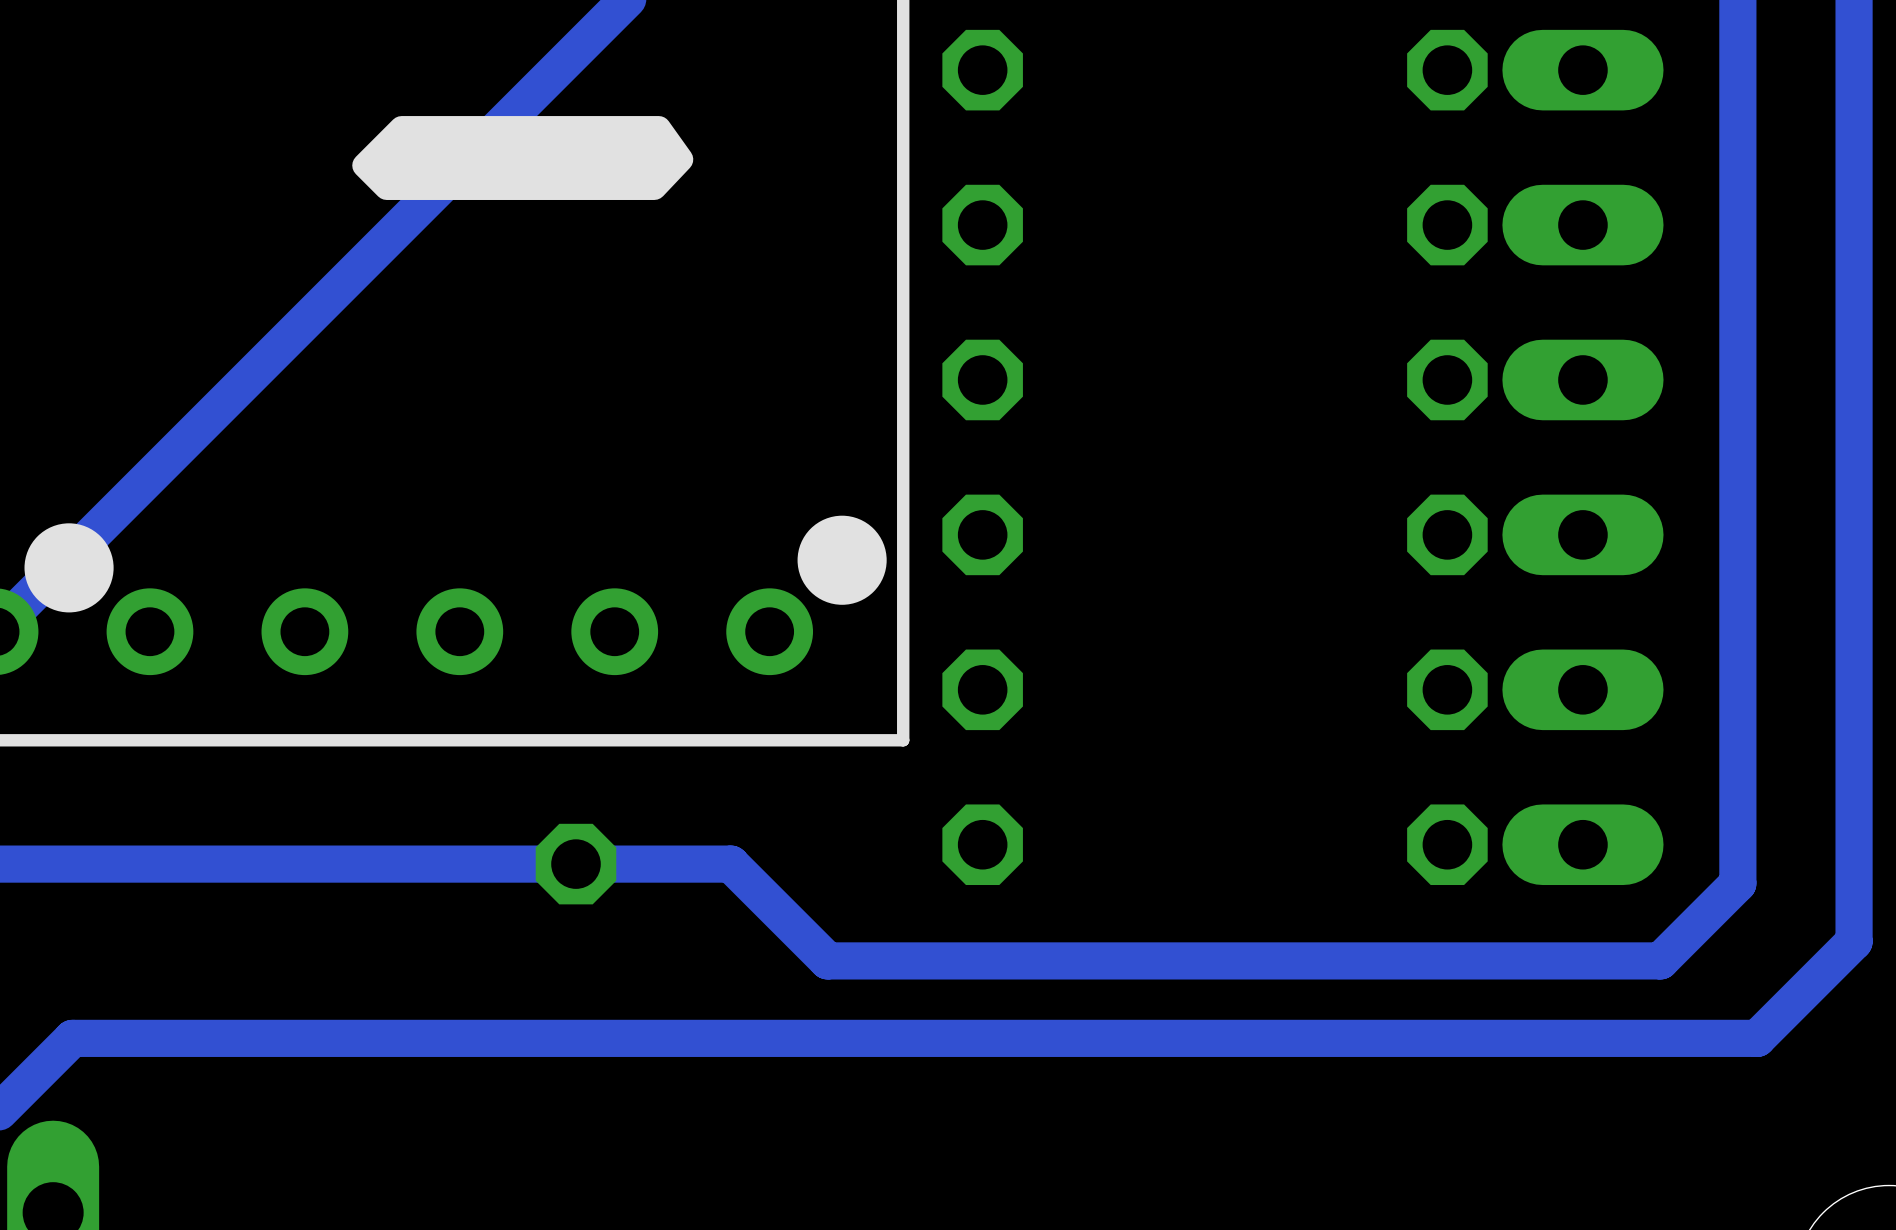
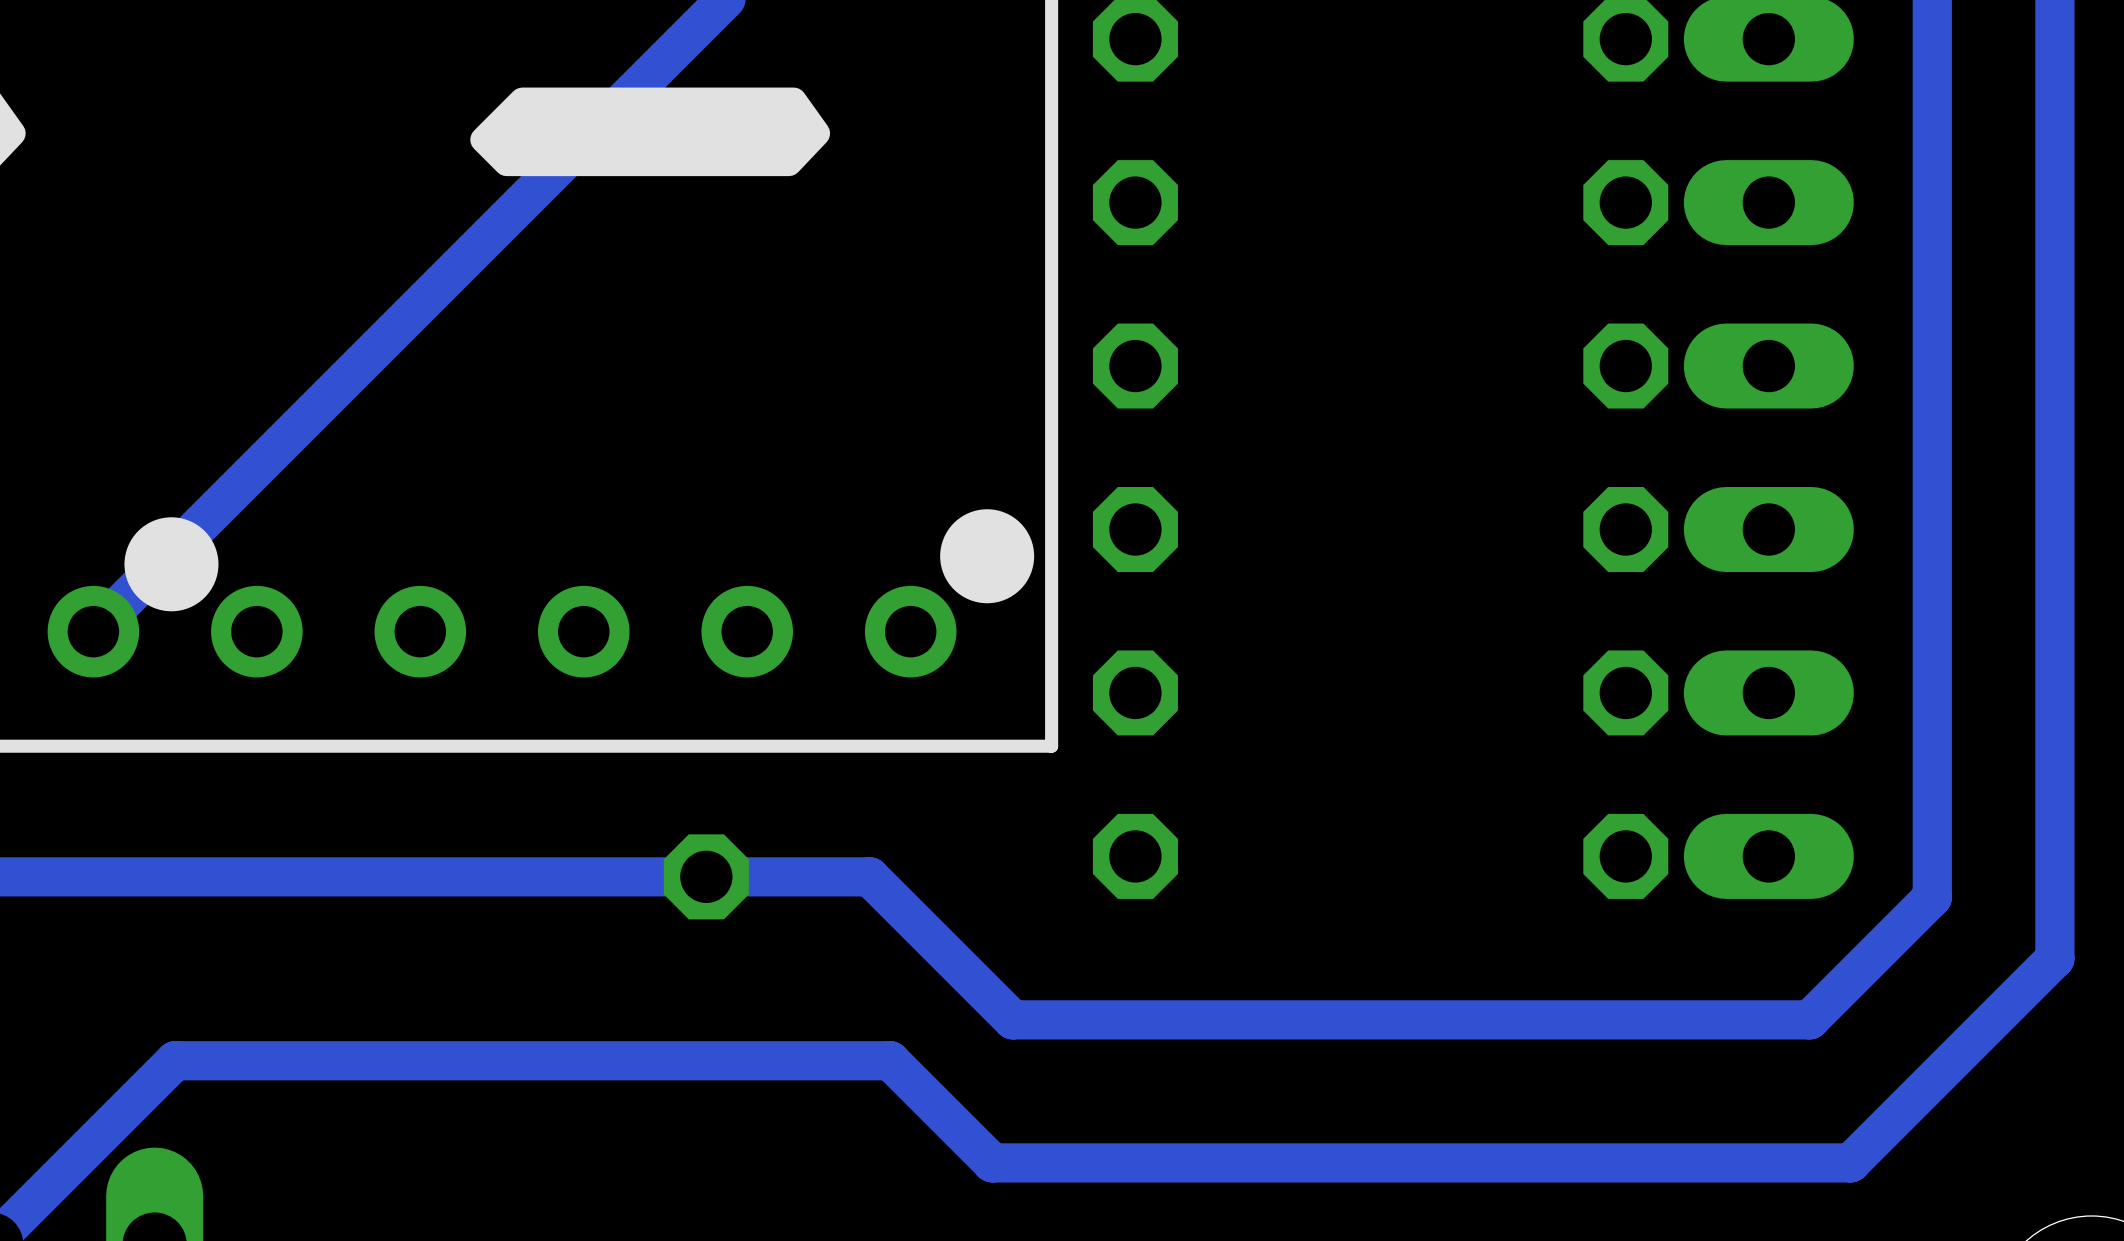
track: (1660, 960) (827, 960) -> (1850, 979) (1809, 1019) (1012, 1019) (971, 979)
track: (1757, 1038) (750, 1038) -> (1952, 1060) (1850, 1162) (992, 1162) (890, 1060)

